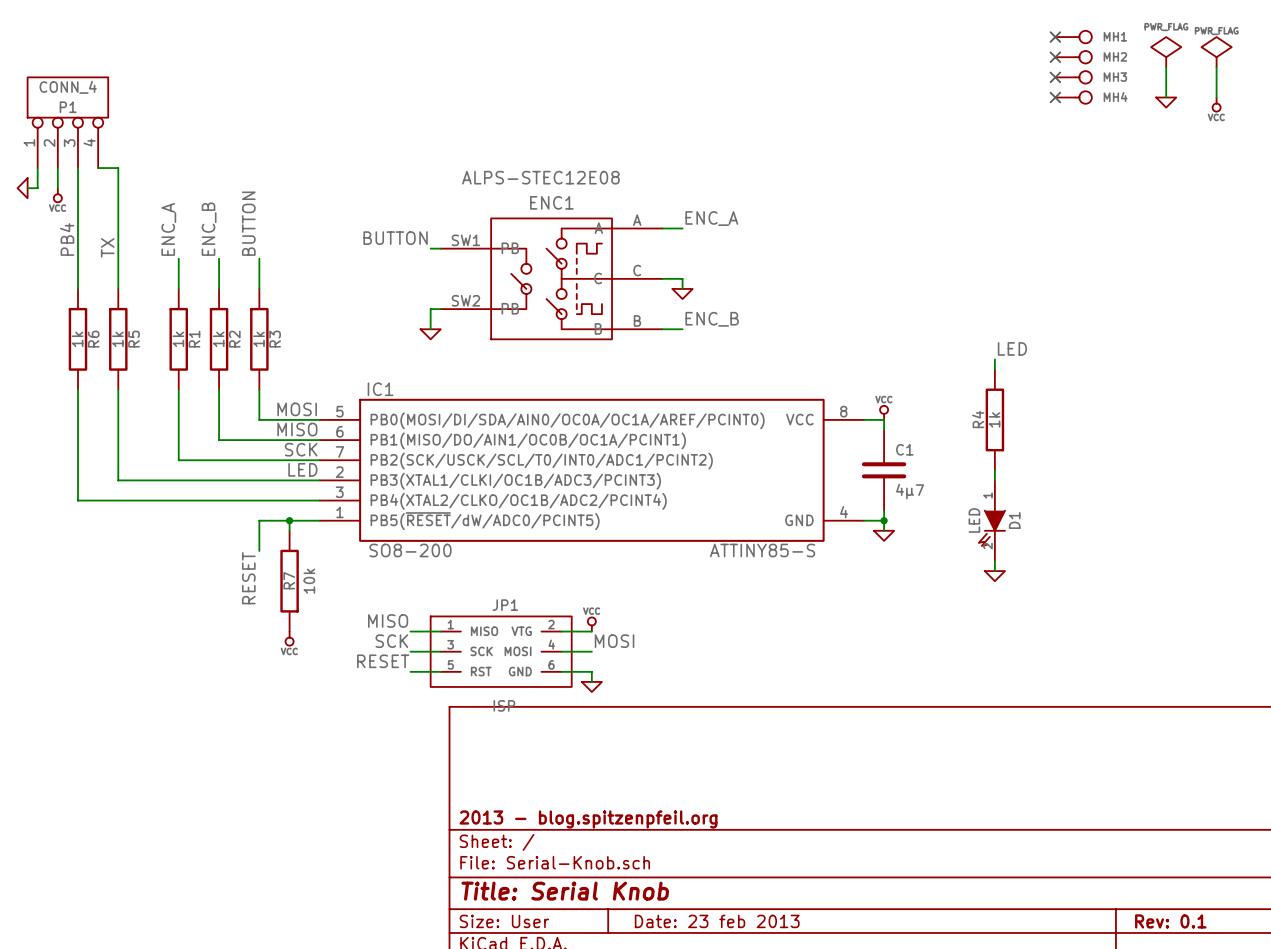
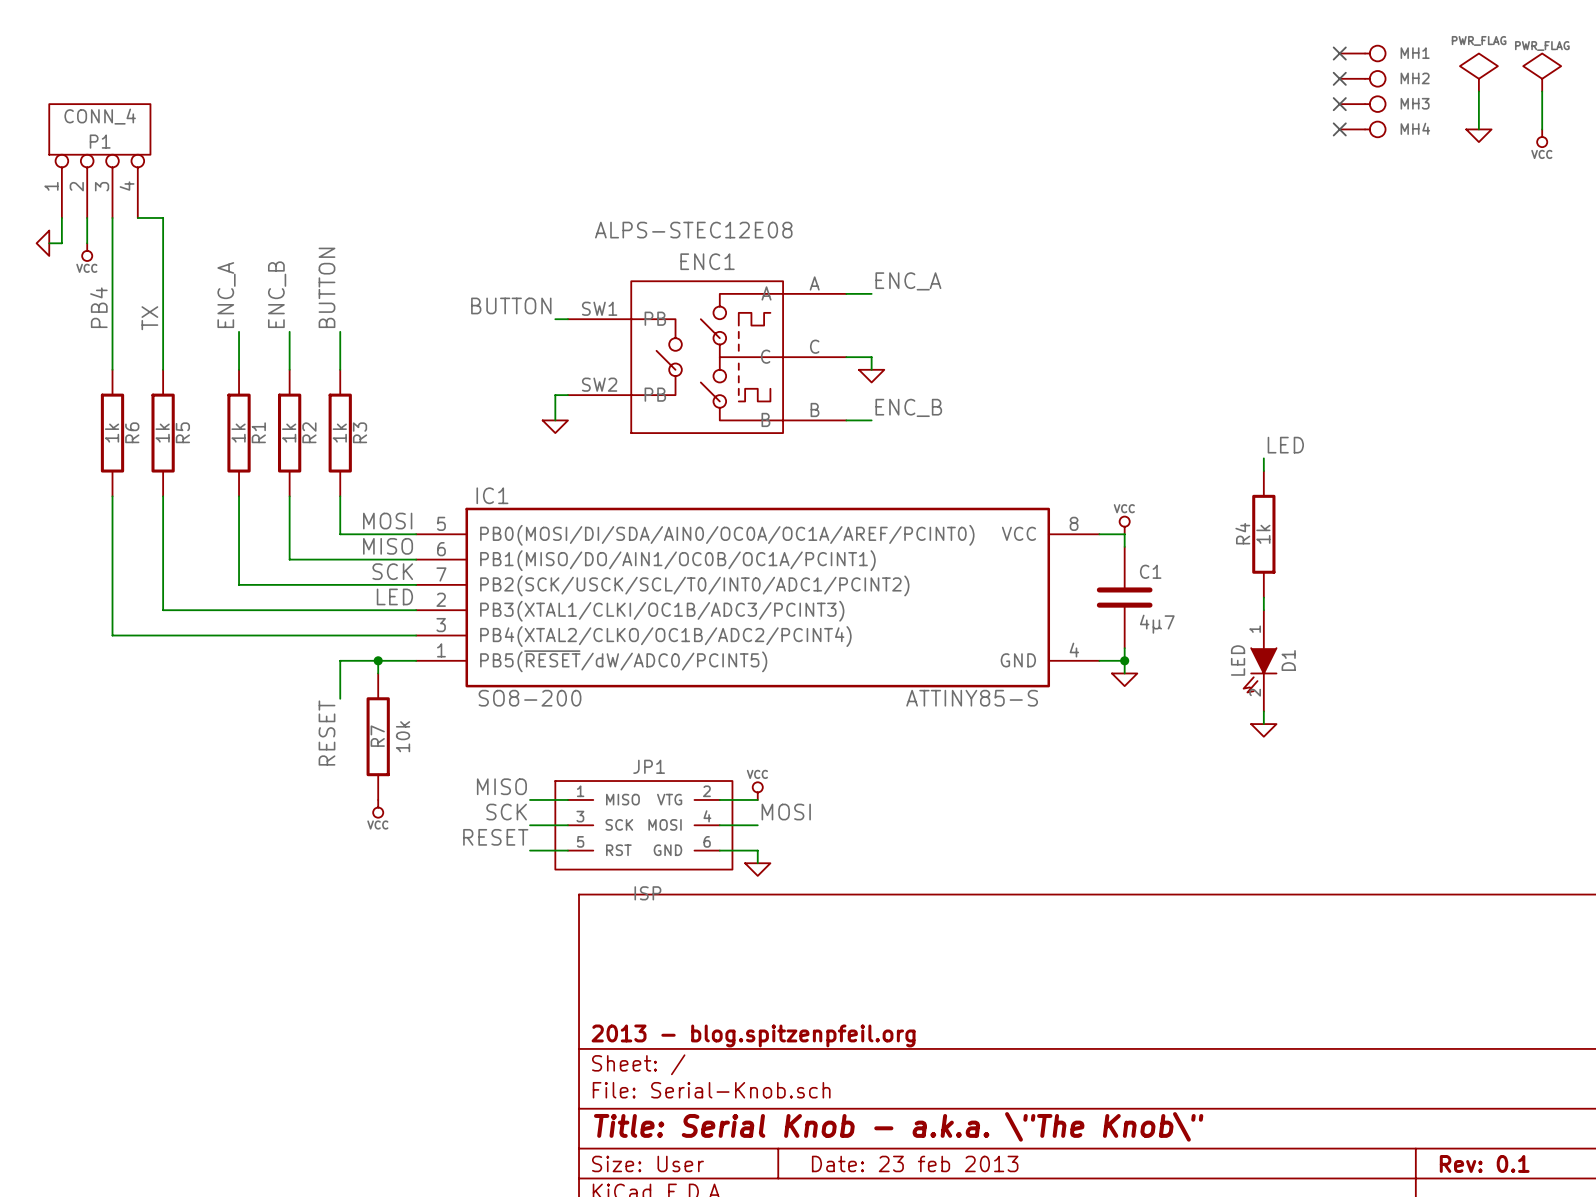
title block: Title: Serial Knob (565, 891) -> Title: Serial Knob - a.k.a. \"The Knob\" (898, 1126)

